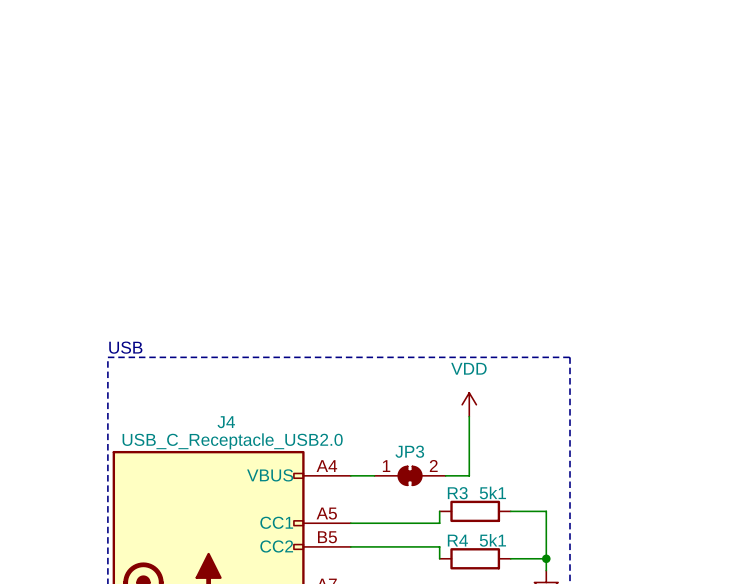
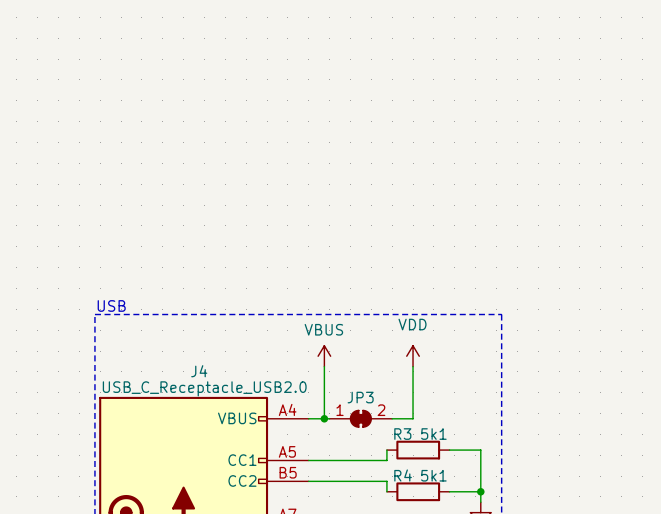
power symbol: none -> VBUS (324, 356)
wire: none -> (324, 366) (324, 418)
junction: none -> (324, 418)

